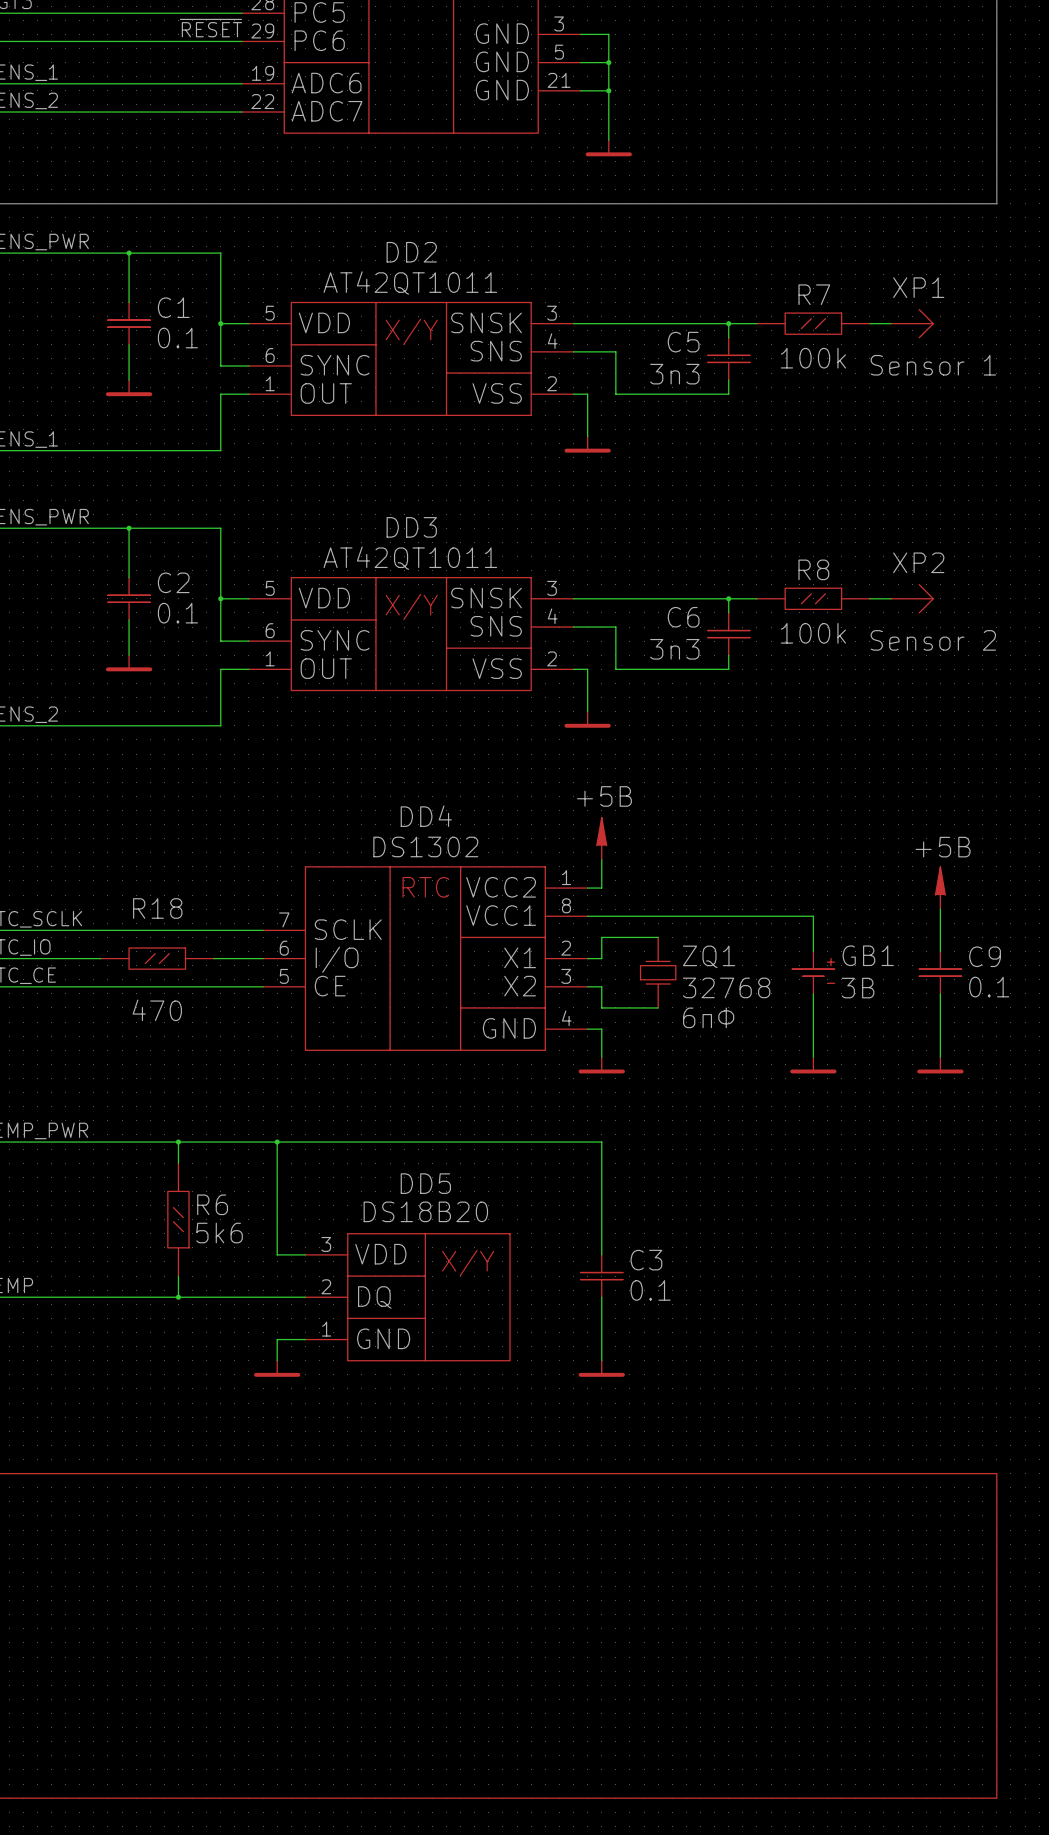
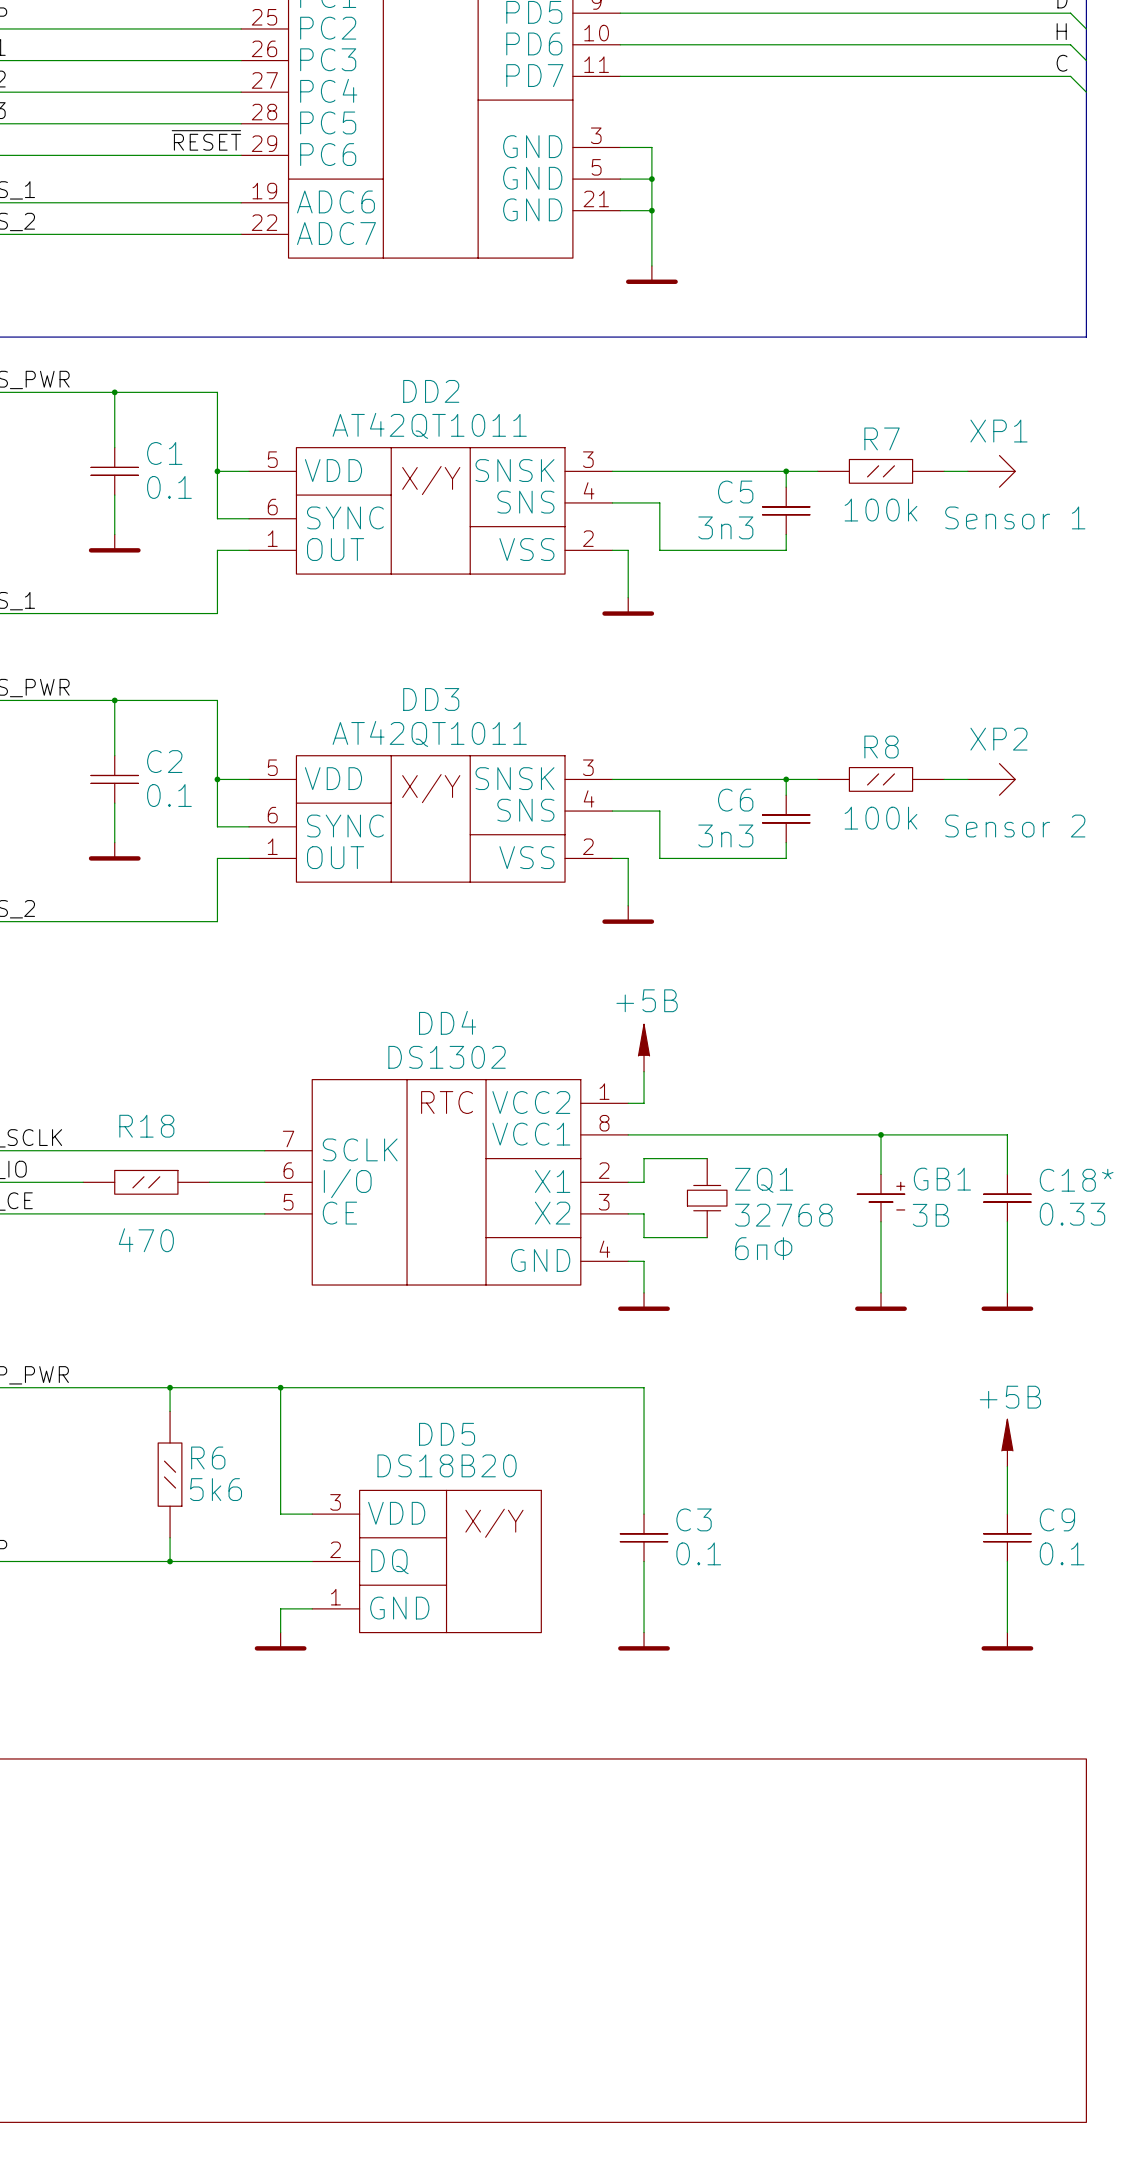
power symbol: +5B (940, 888) -> none
wire: (940, 909) (940, 951) -> none
wire: none -> (881, 1134) (1007, 1134) (1007, 1174)
junction: none -> (881, 1134)
C18*: none -> 0.33 (1007, 1198)
C9 position: (940, 972) -> (1007, 1537)
wire: (940, 993) (940, 1057) -> (1007, 1221) (1007, 1292)
power symbol position: (940, 1065) -> (1007, 1301)
power symbol: none -> +5B (1007, 1443)
wire: none -> (1007, 1466) (1007, 1514)
wire: none -> (1007, 1561) (1007, 1632)
power symbol: none -> (1007, 1641)

